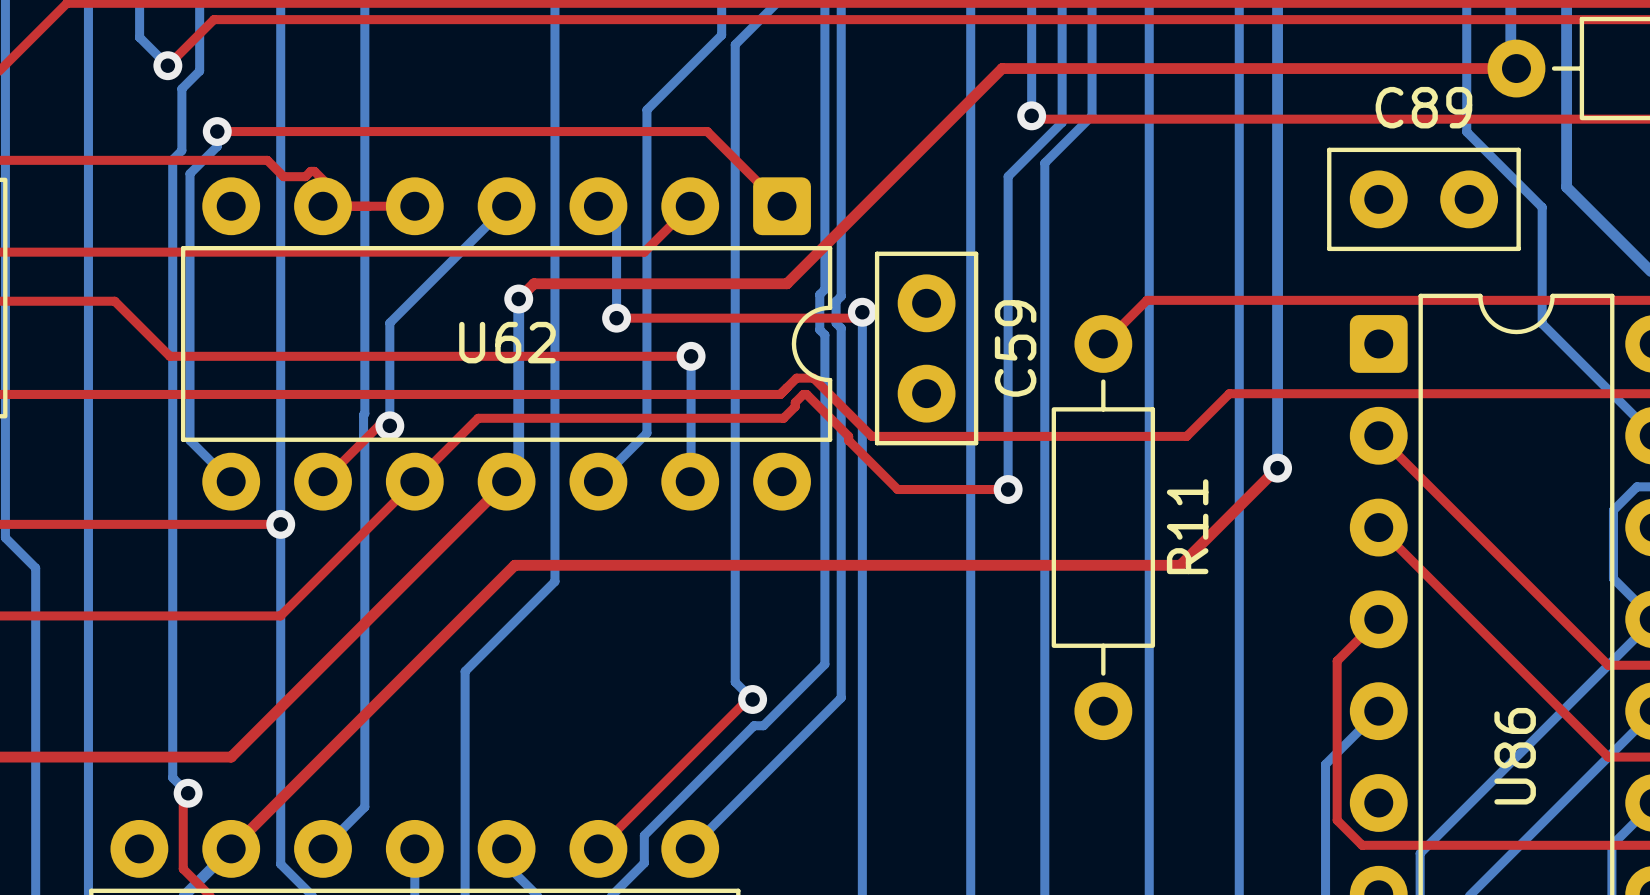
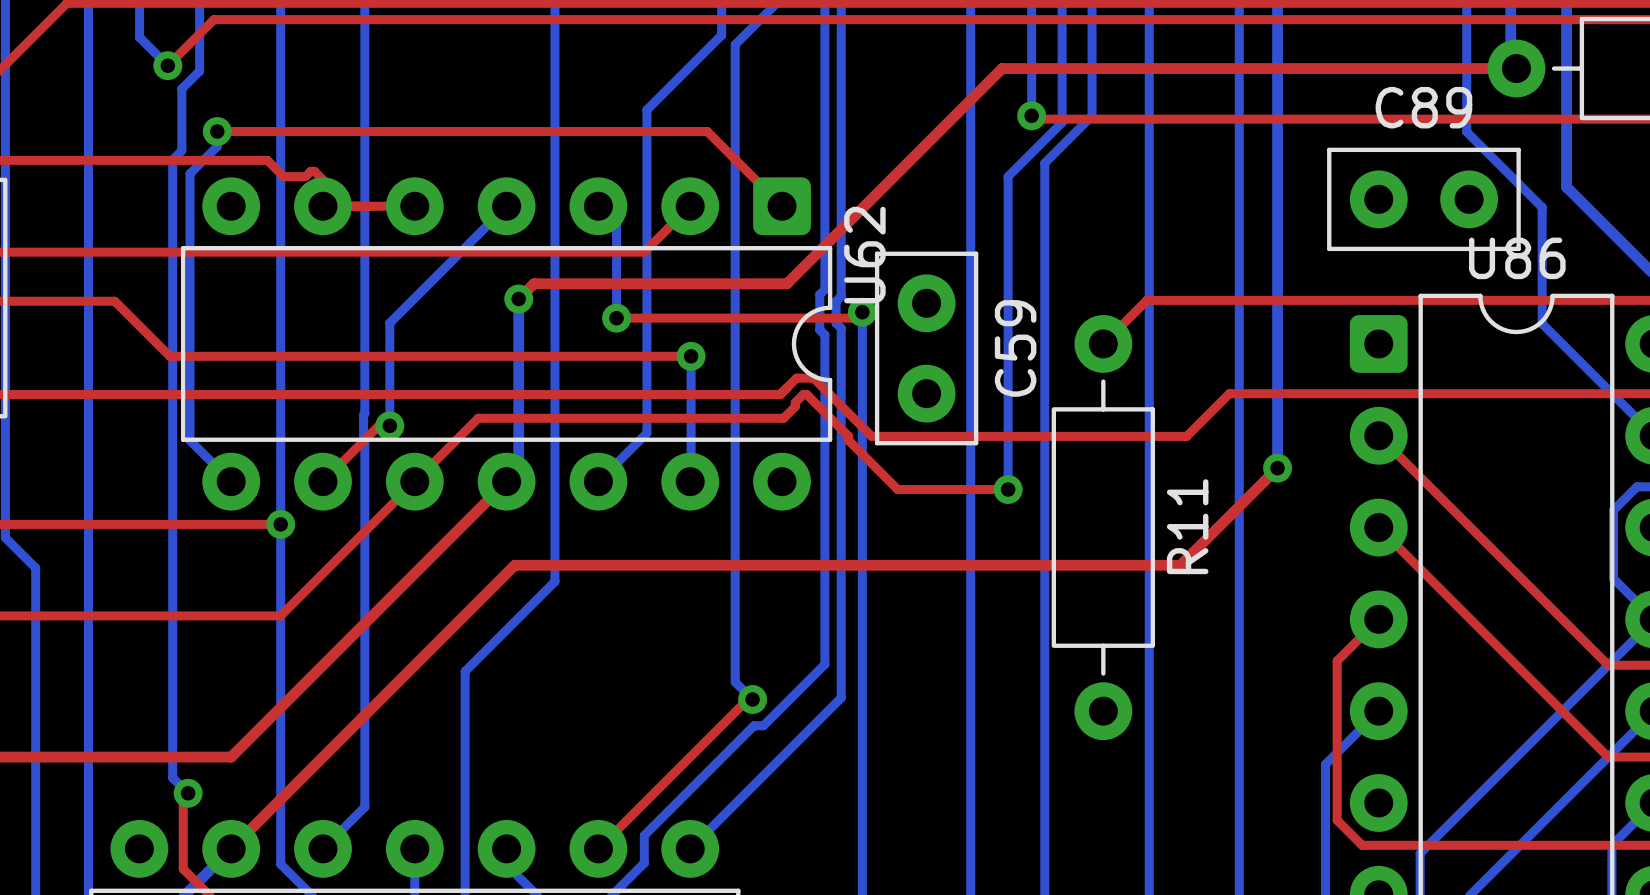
U62 name rotation: 0° (507, 342) -> 90° counterclockwise (864, 255)
U62 name position: U62 (507, 342) -> U62 (864, 255)
U86 name rotation: 0° (1515, 756) -> 90° clockwise (1517, 258)
U86 name position: U86 (1515, 756) -> U86 (1517, 258)

